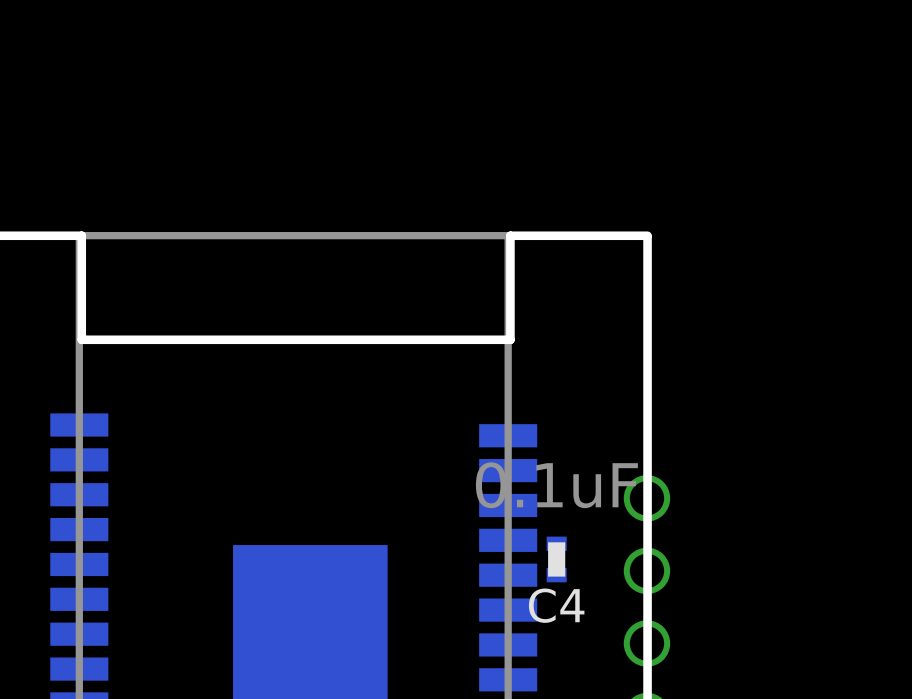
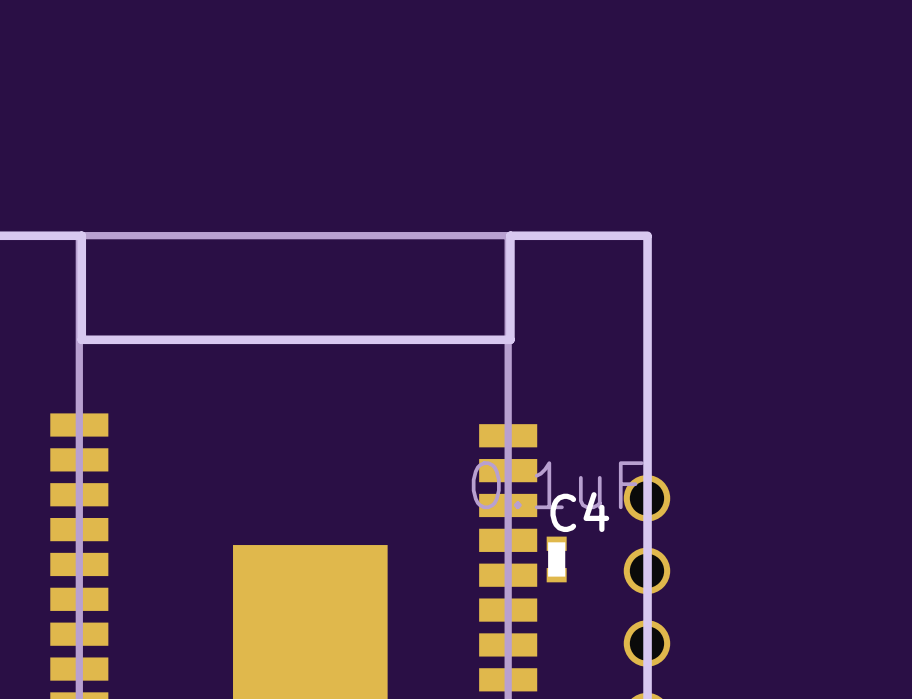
C4 name position: C4 (556, 605) -> C4 (579, 512)

